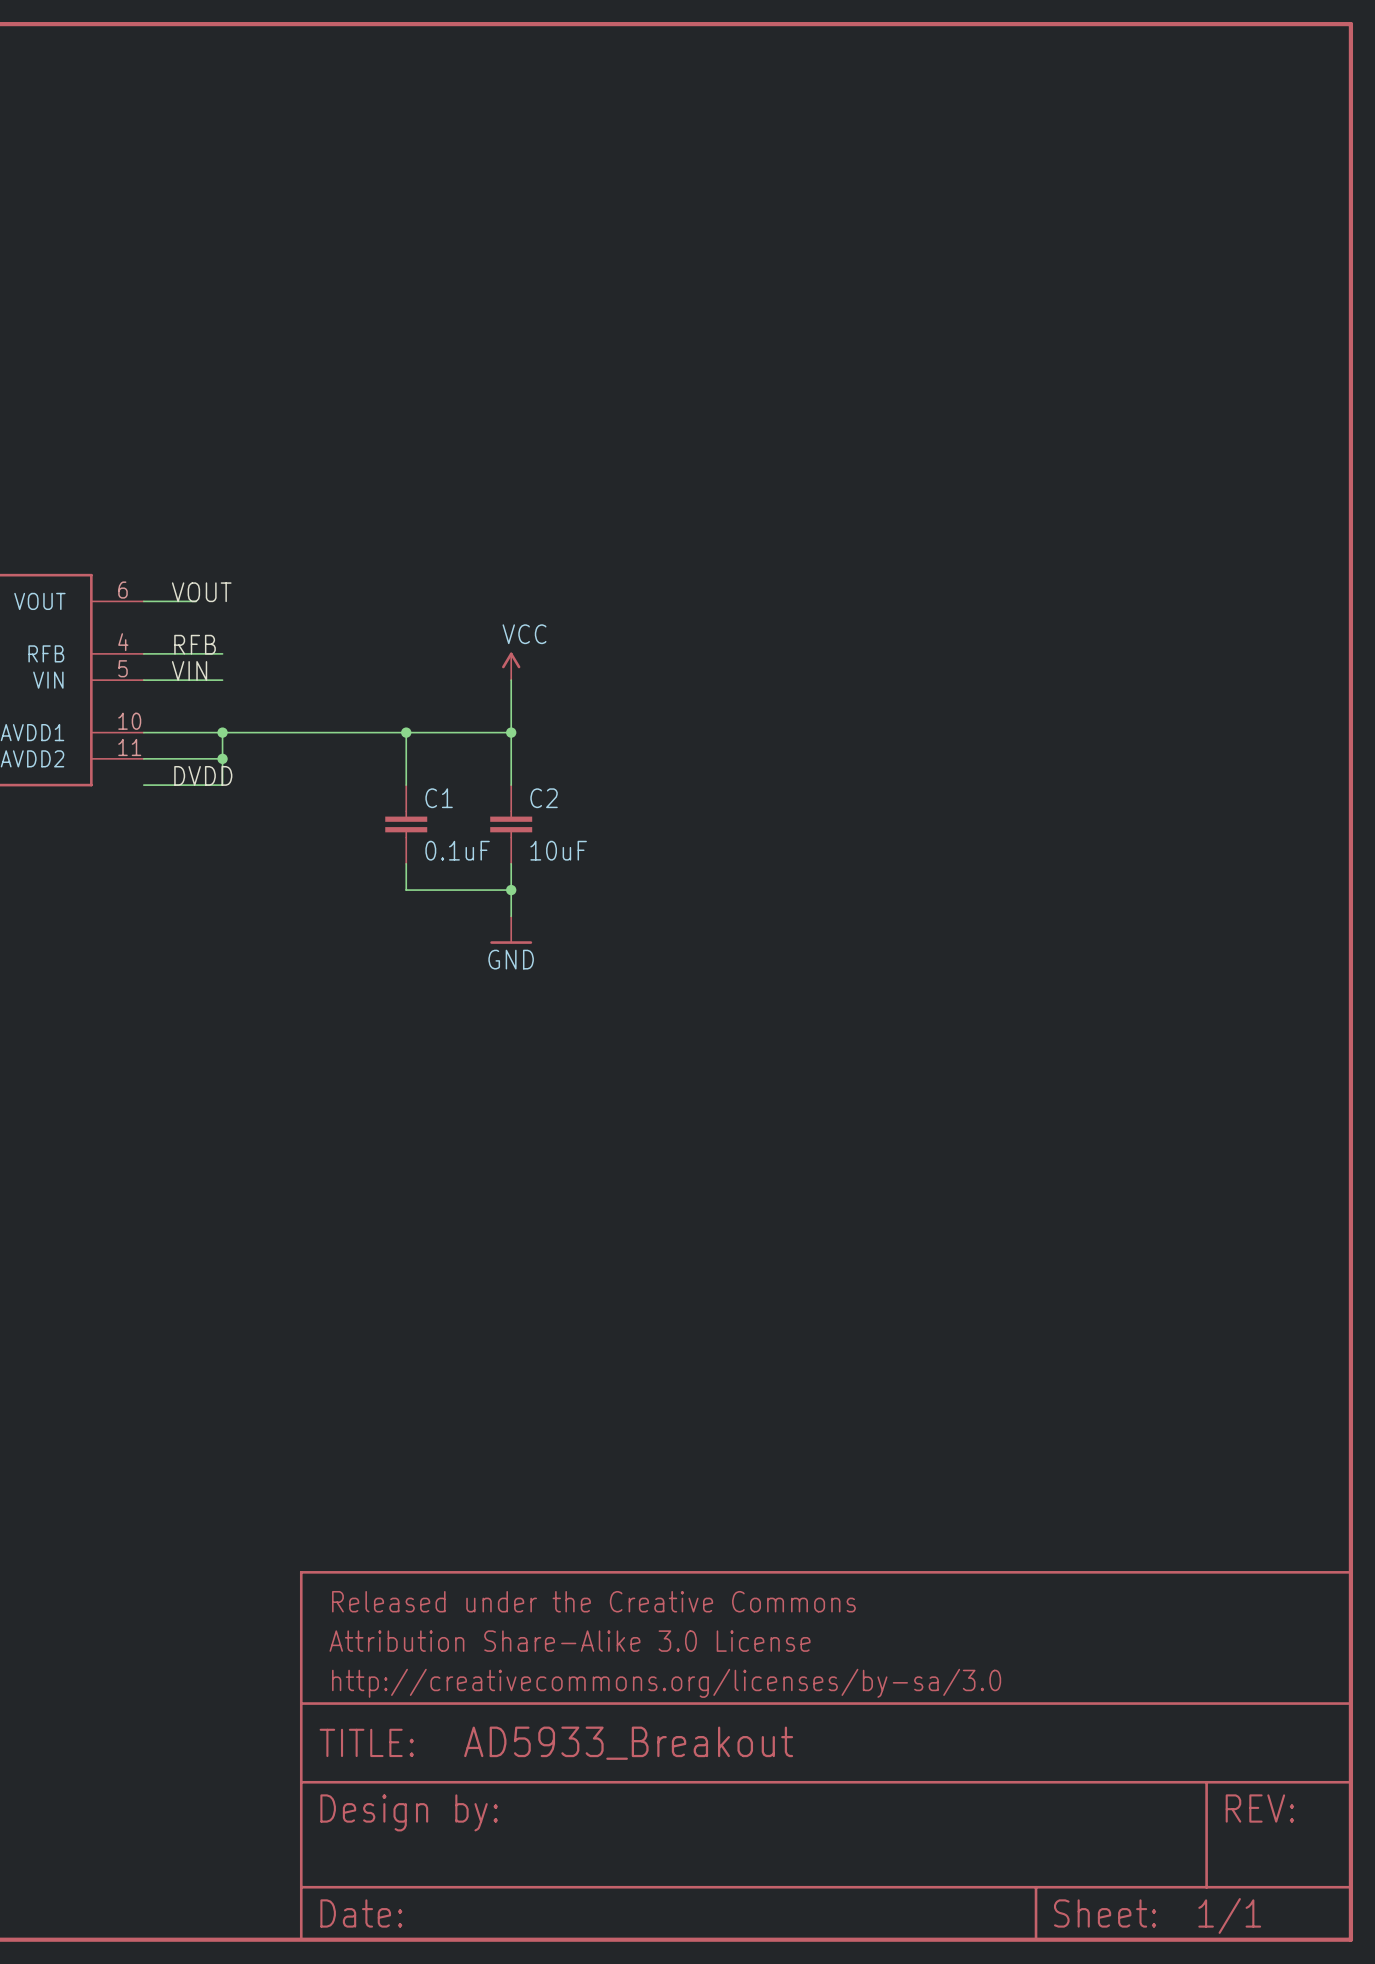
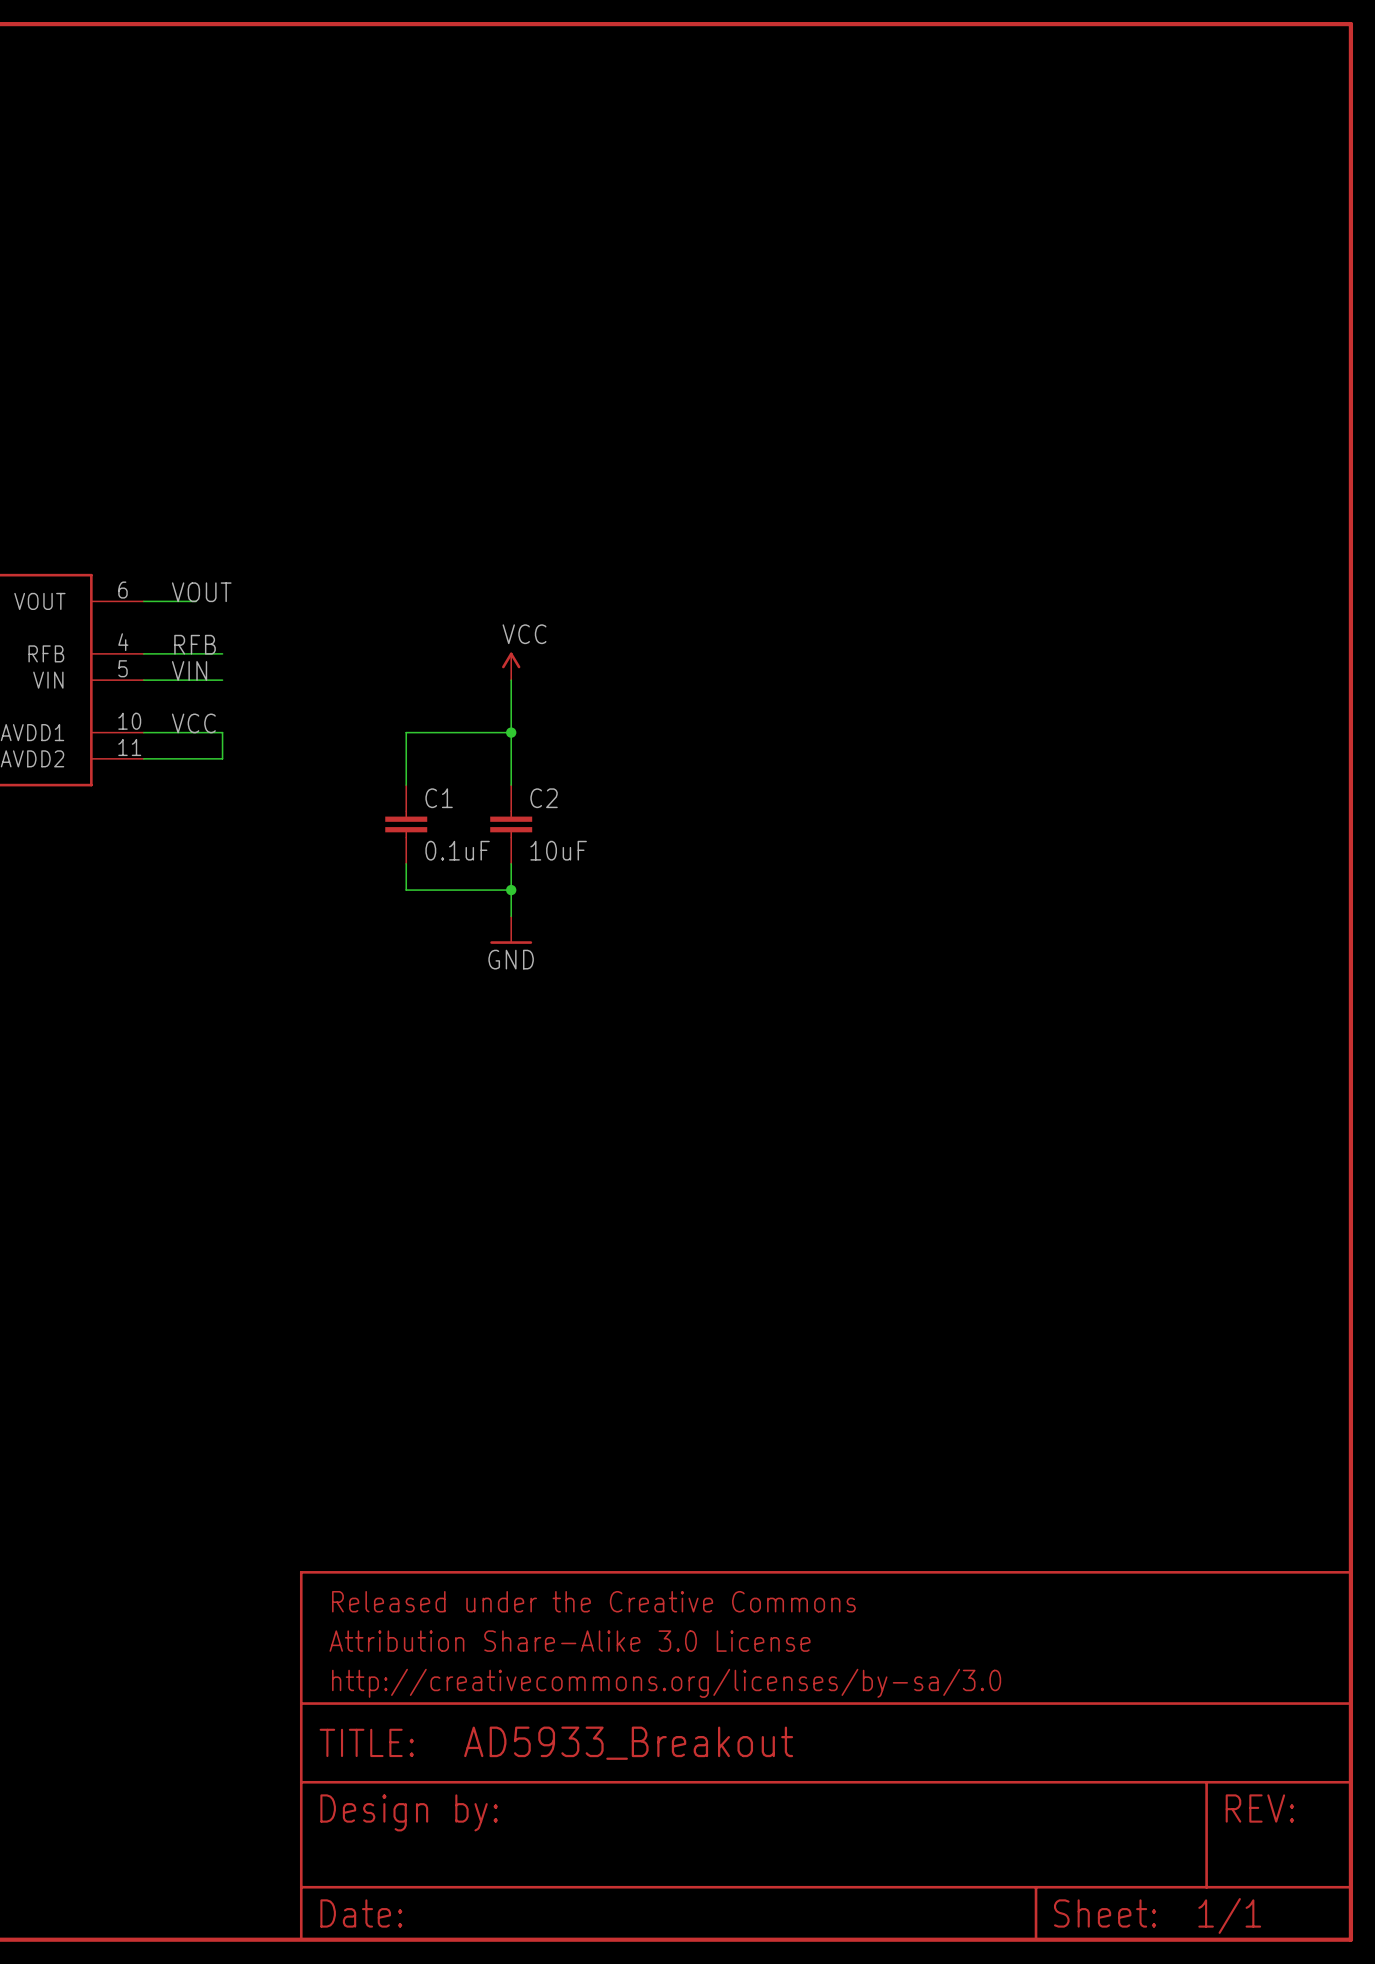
label: none -> VCC (193, 723)
wire: (222, 732) (406, 732) -> none
junction: (222, 732) -> none
junction: (406, 732) -> none
wire: (222, 758) (222, 785) (143, 785) -> none
junction: (222, 758) -> none
label: DVDD (203, 775) -> none

